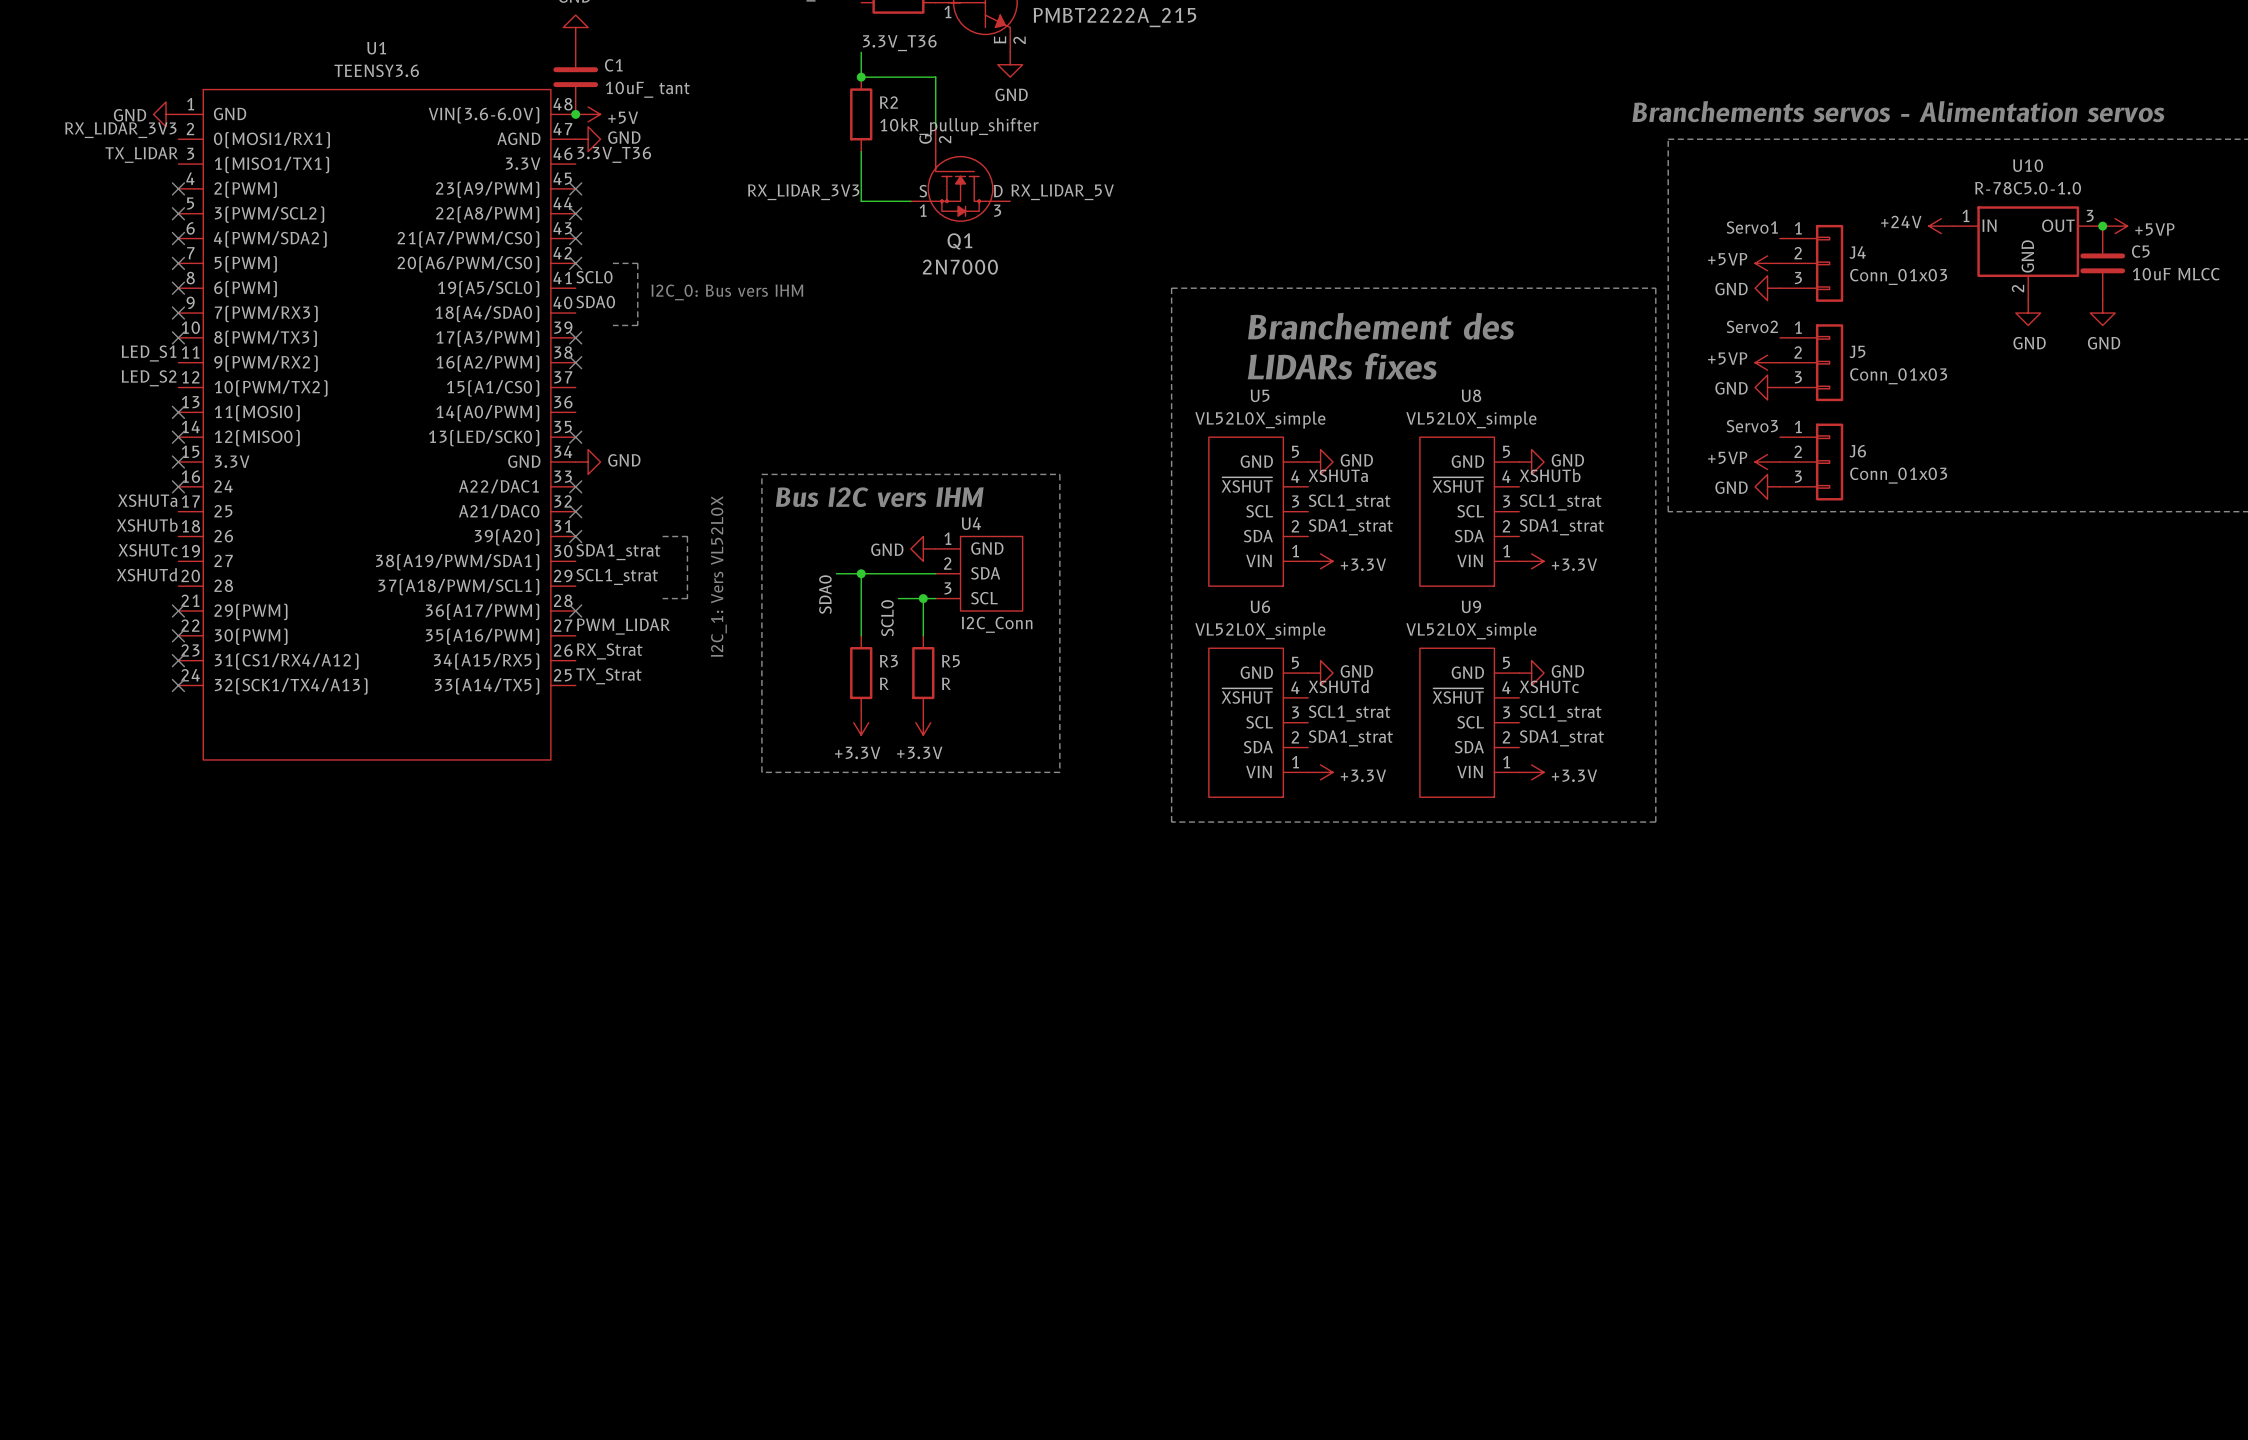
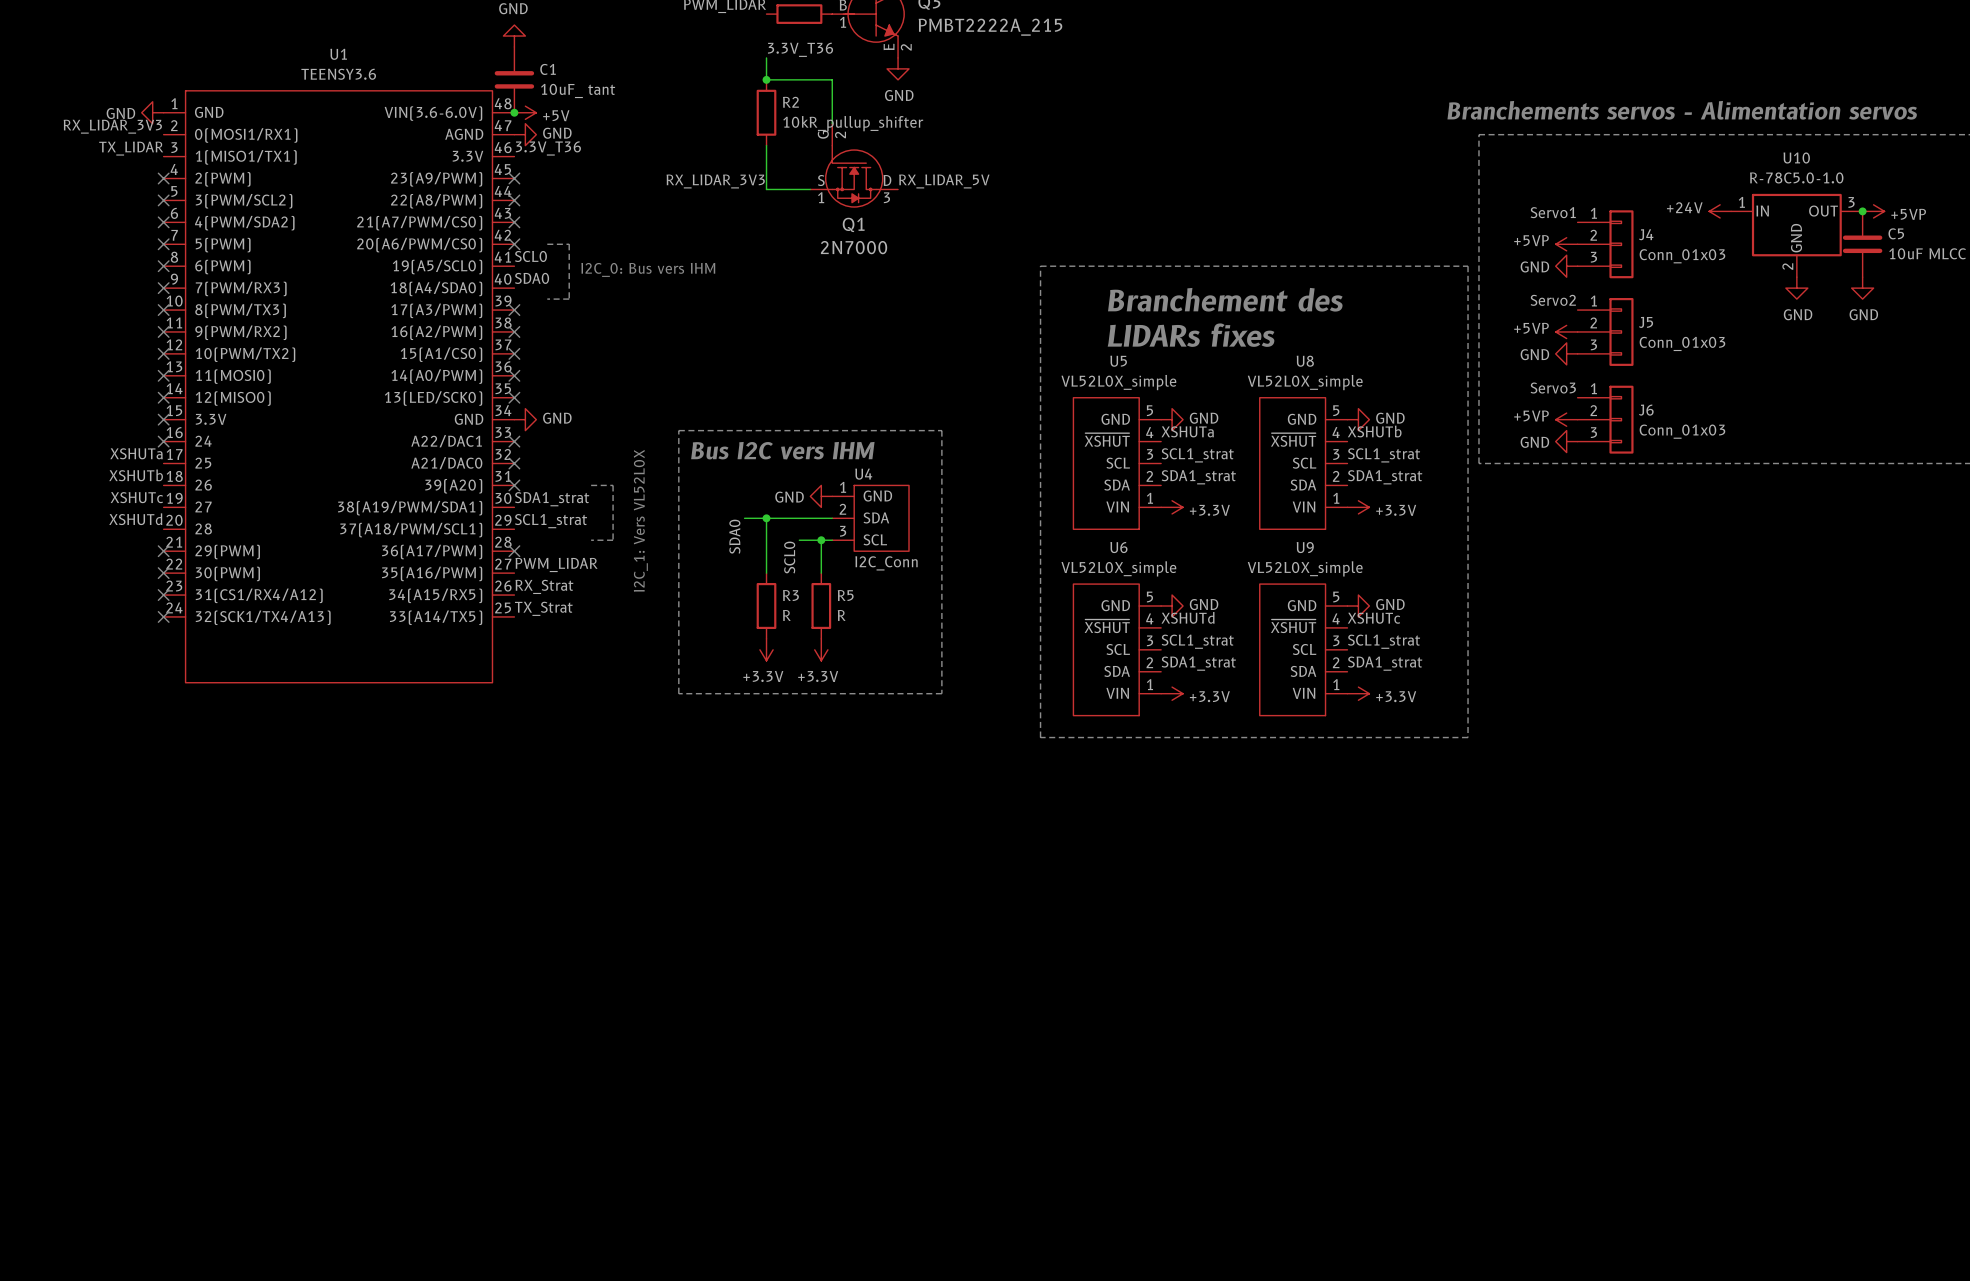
label: LED_S1 (149, 353) -> none
no-connect mark: none -> (163, 331)
label: LED_S2 (149, 378) -> none
no-connect mark: none -> (163, 353)
no-connect mark: none -> (514, 353)
no-connect mark: none -> (514, 375)

